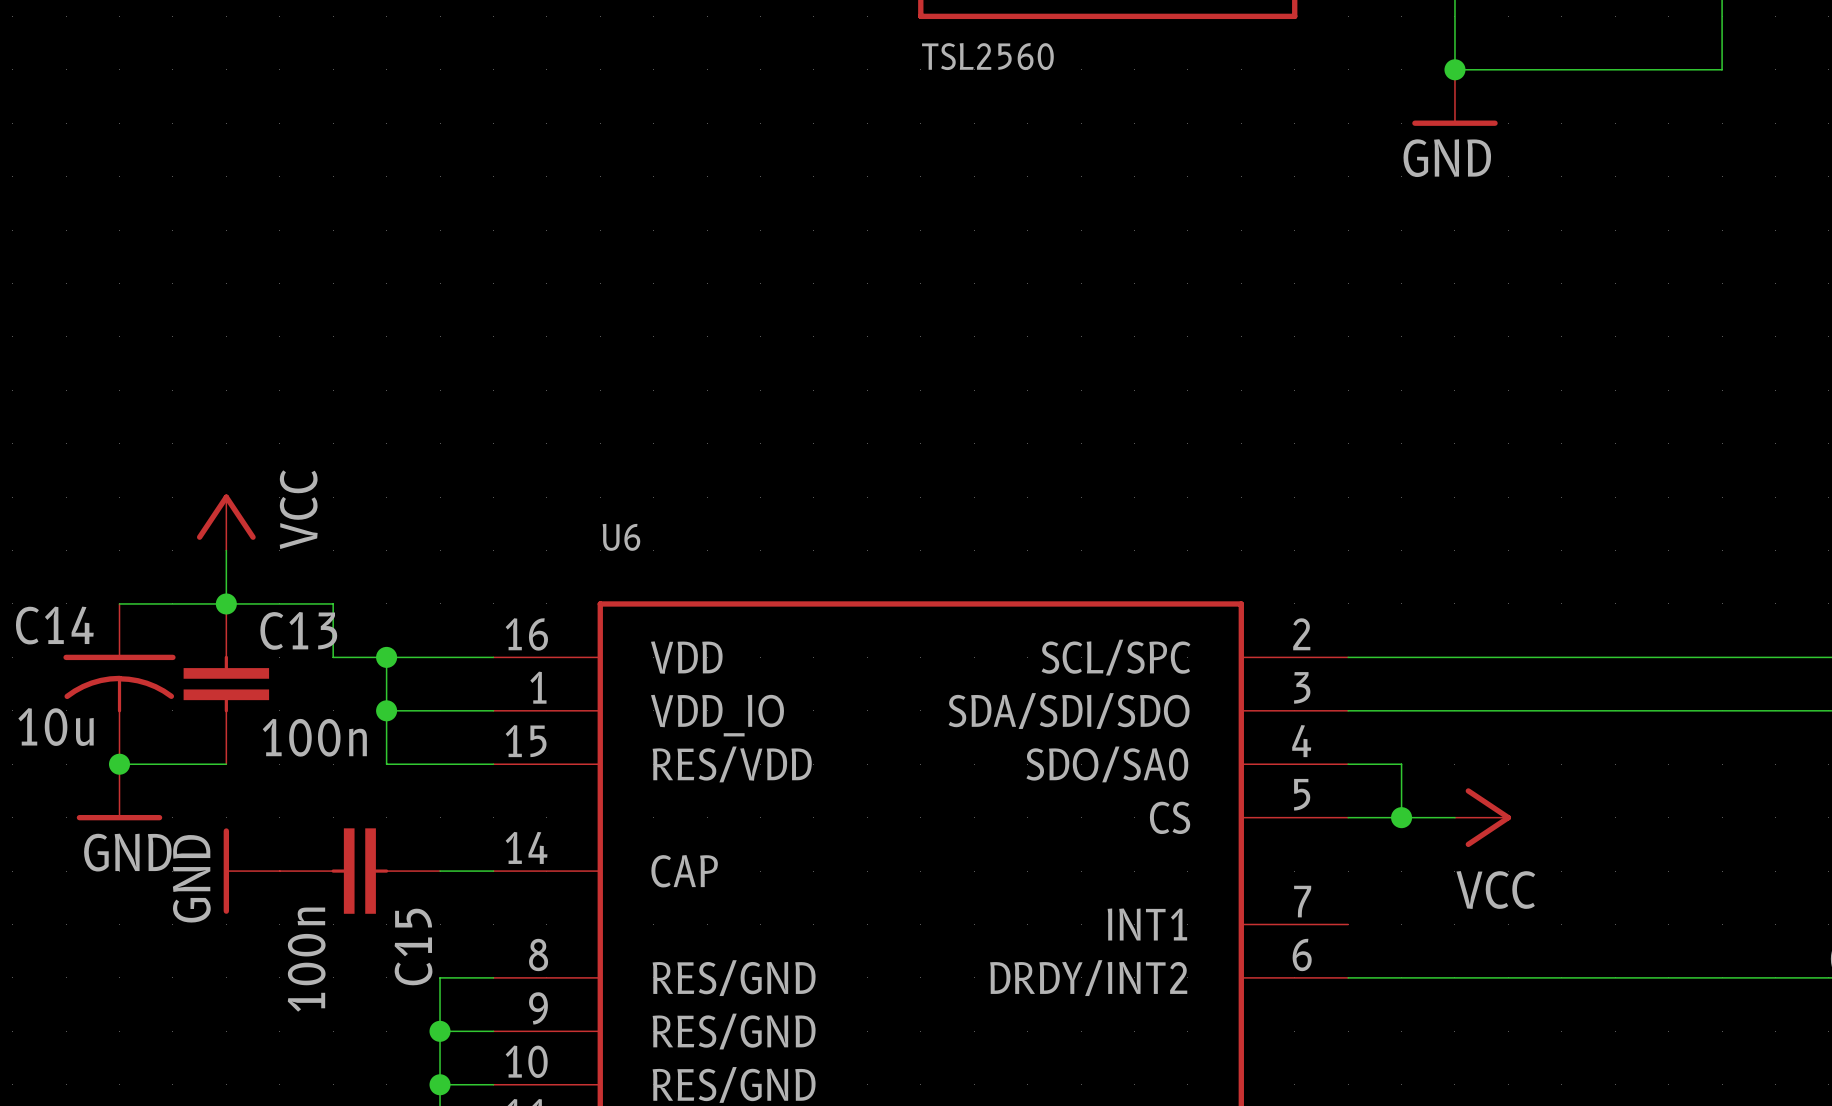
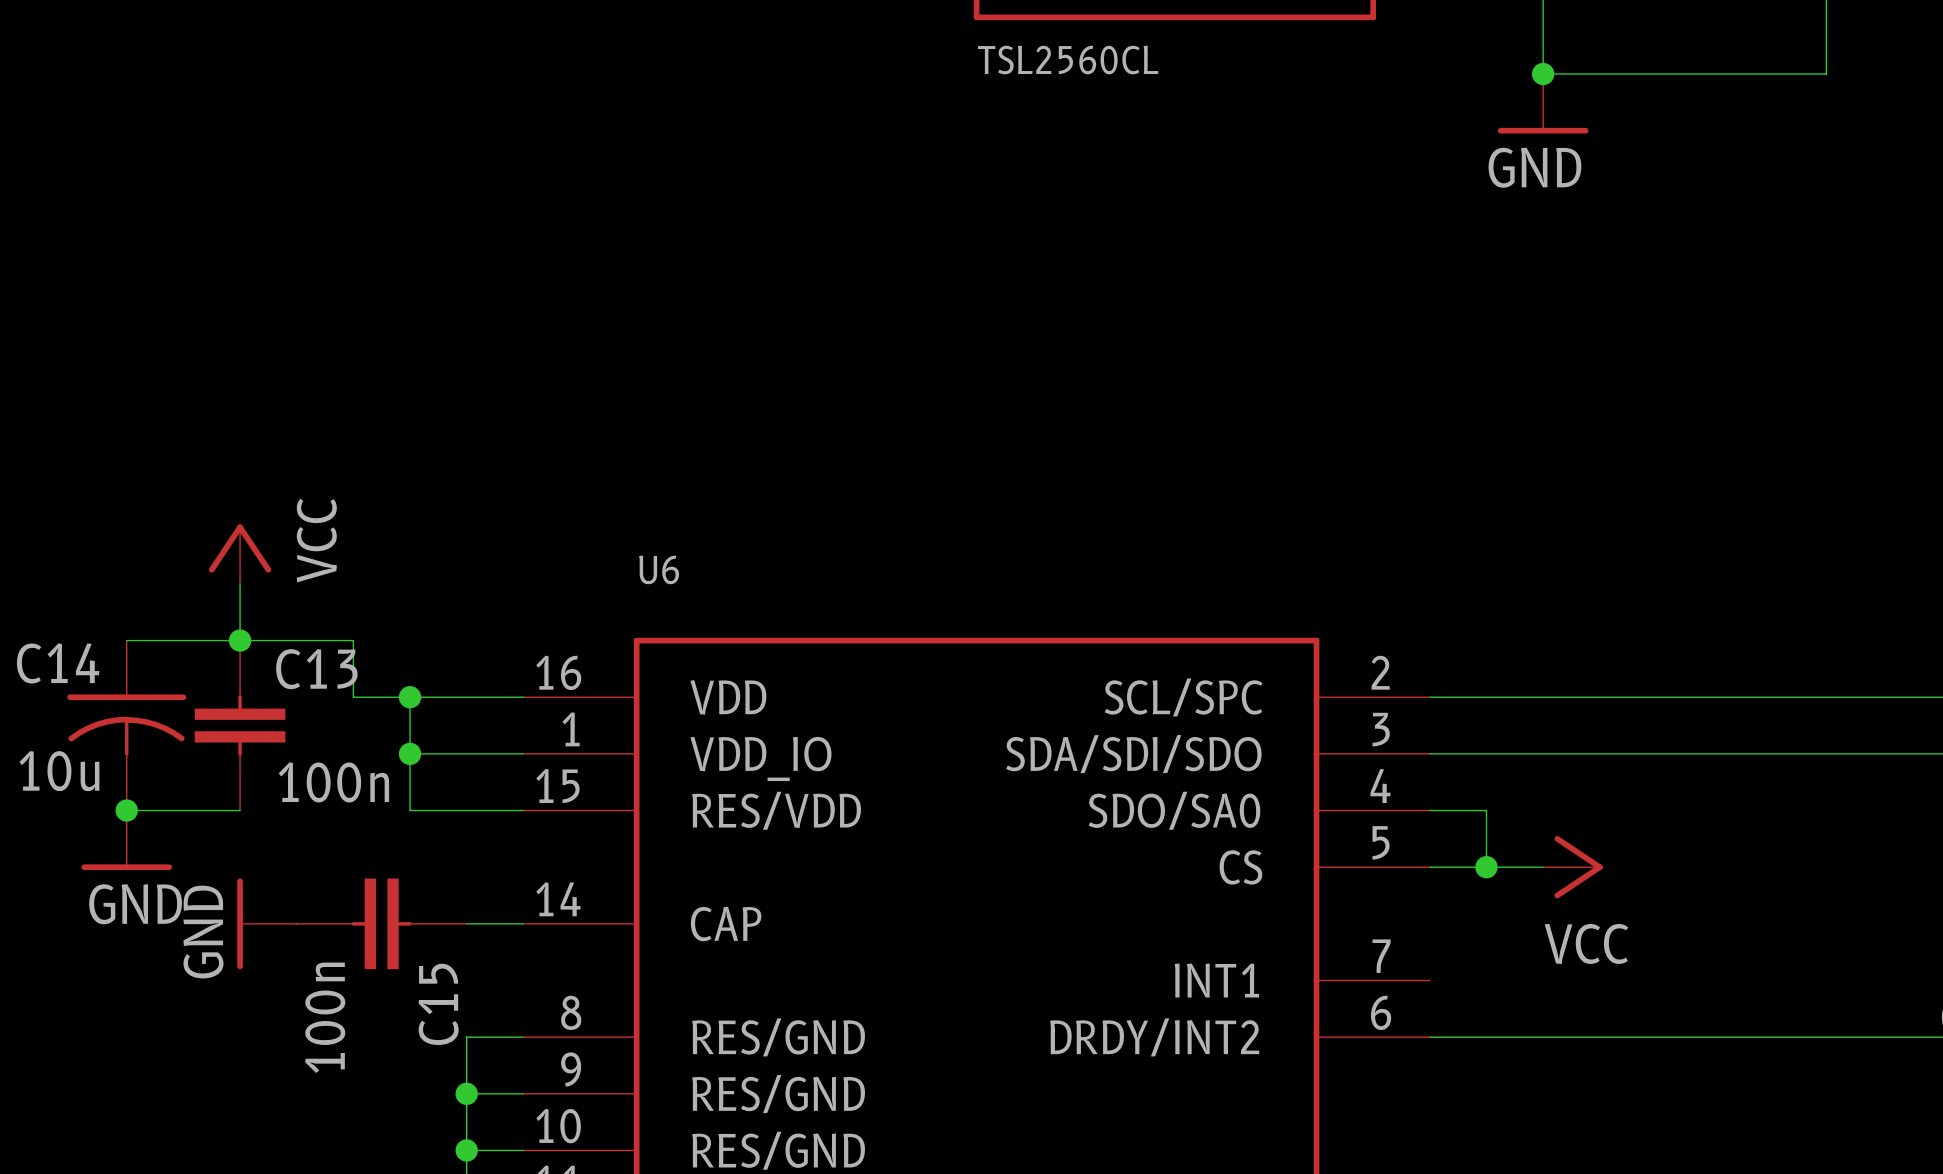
part value: TSL2560 (987, 56) -> TSL2560CL (1068, 60)

